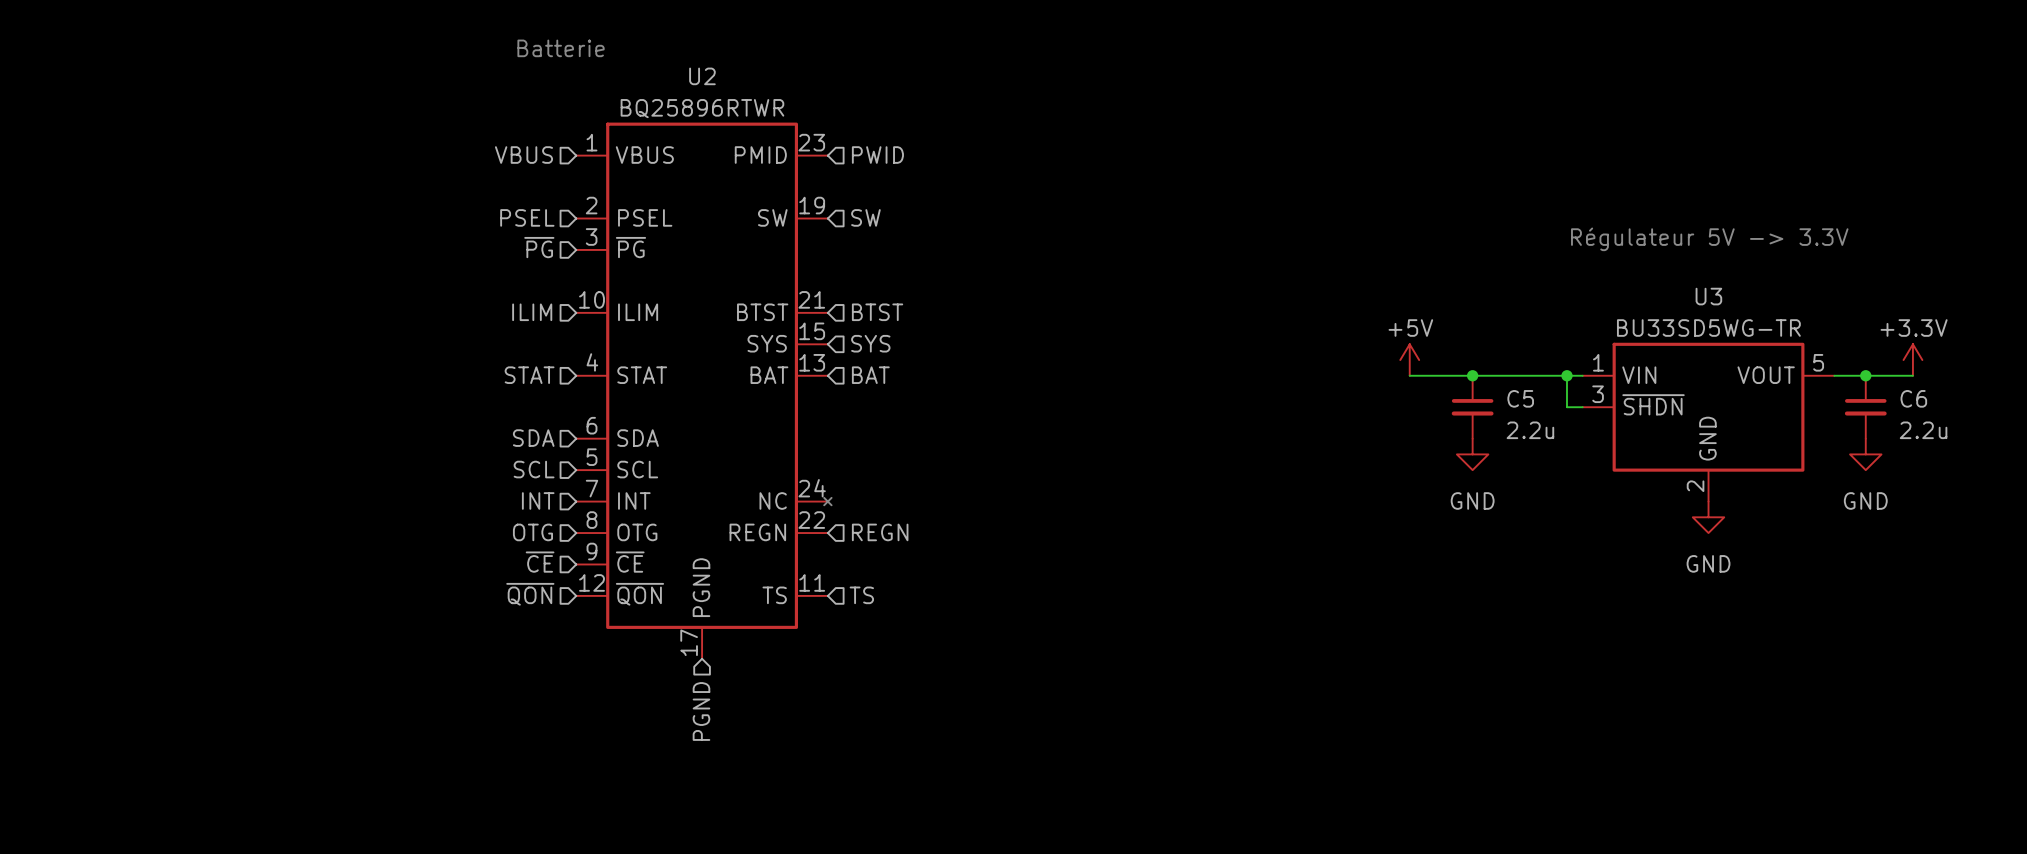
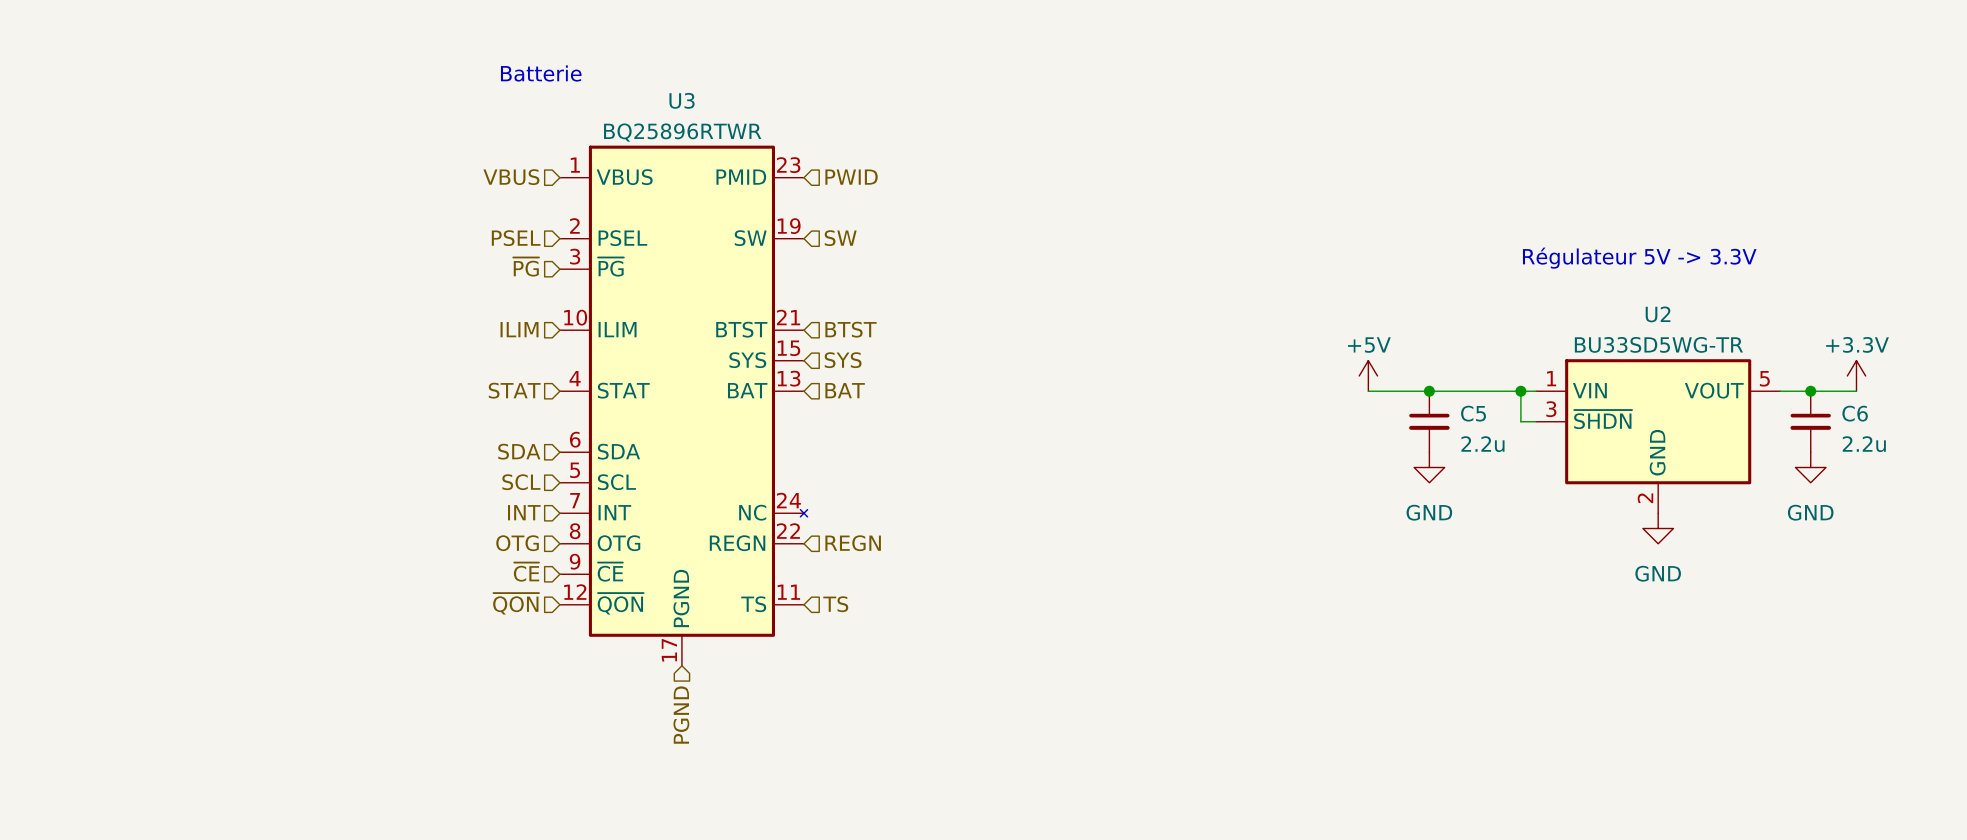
U2 name: U2 (702, 76) -> U3 (682, 100)
U3 name: U3 (1708, 296) -> U2 (1658, 314)

